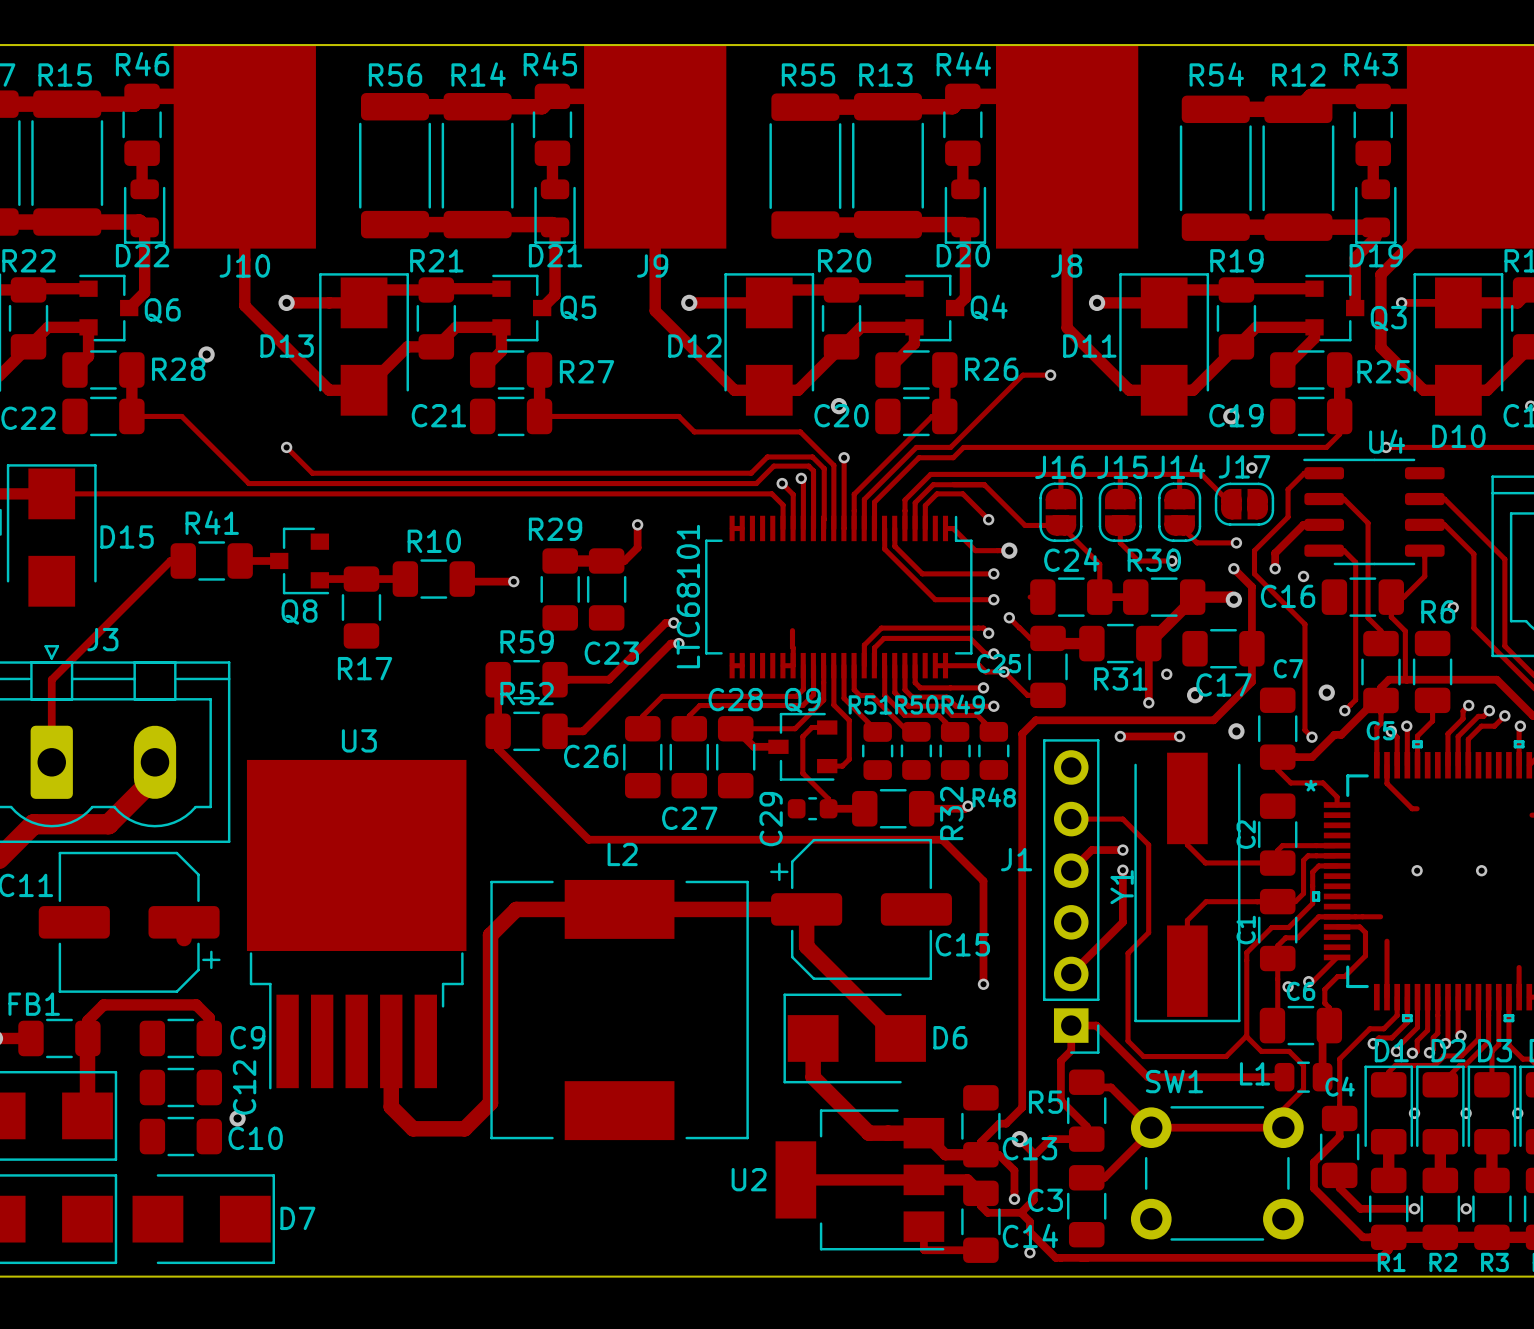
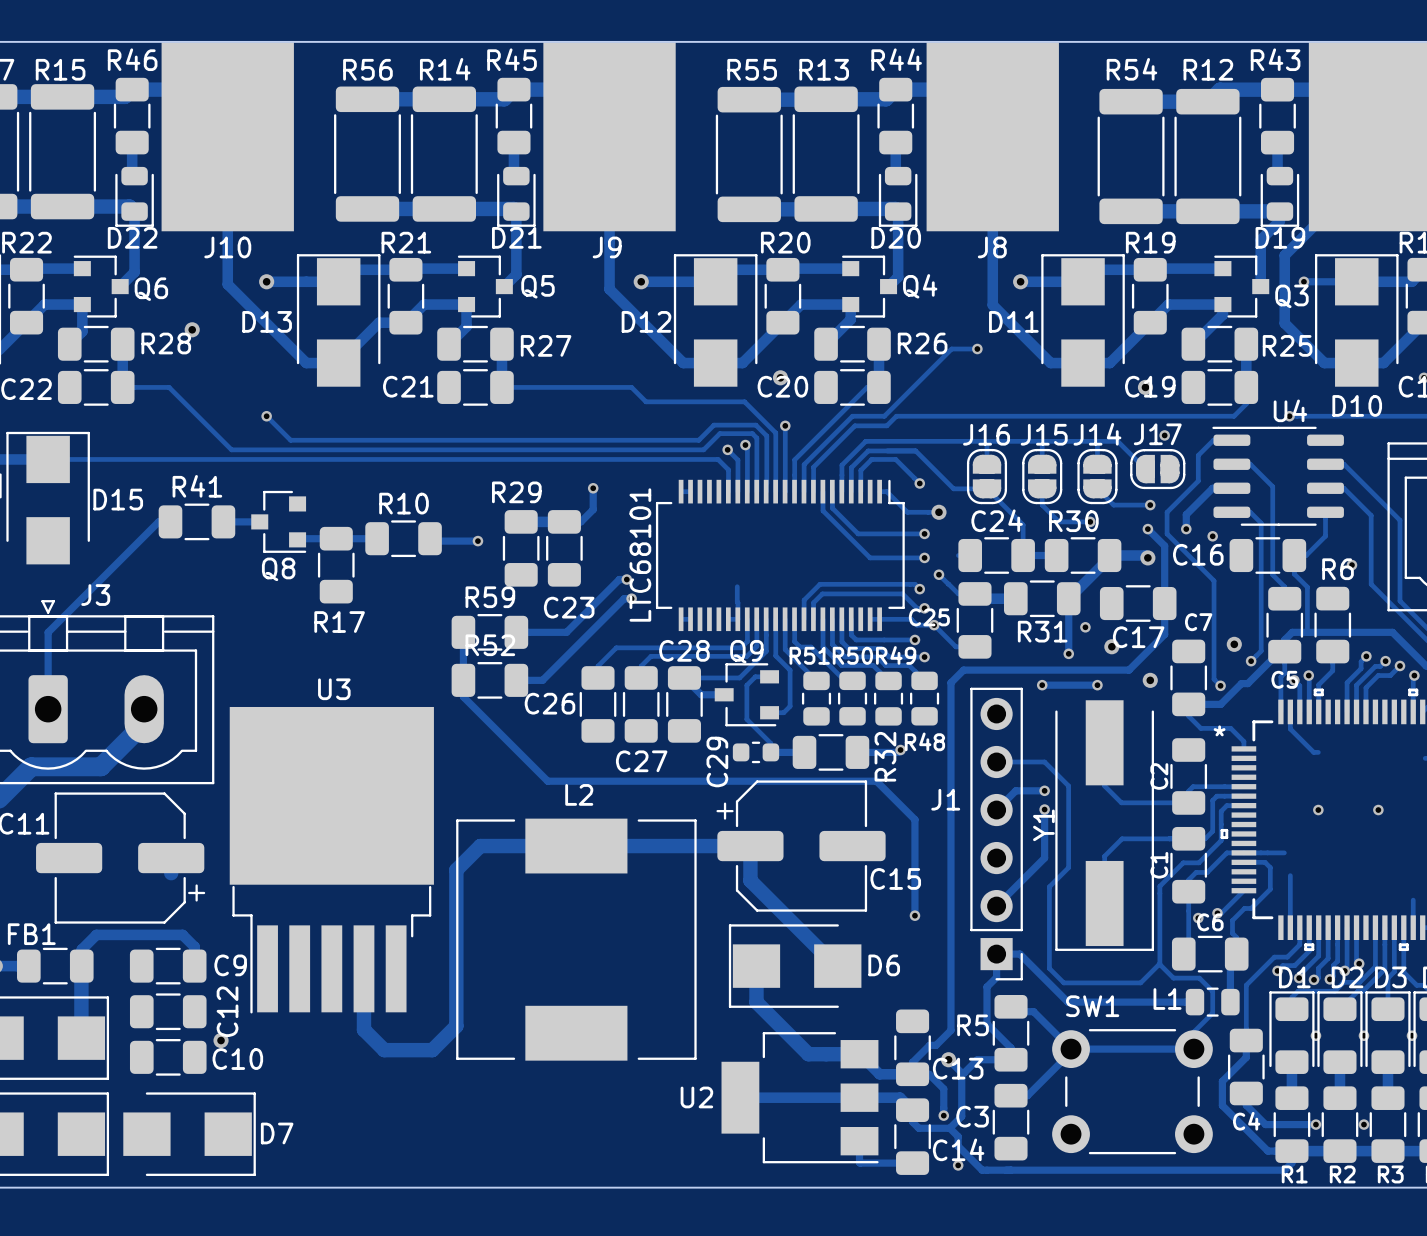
C4 name position: C4 (1340, 1086) -> C4 (1246, 1121)

